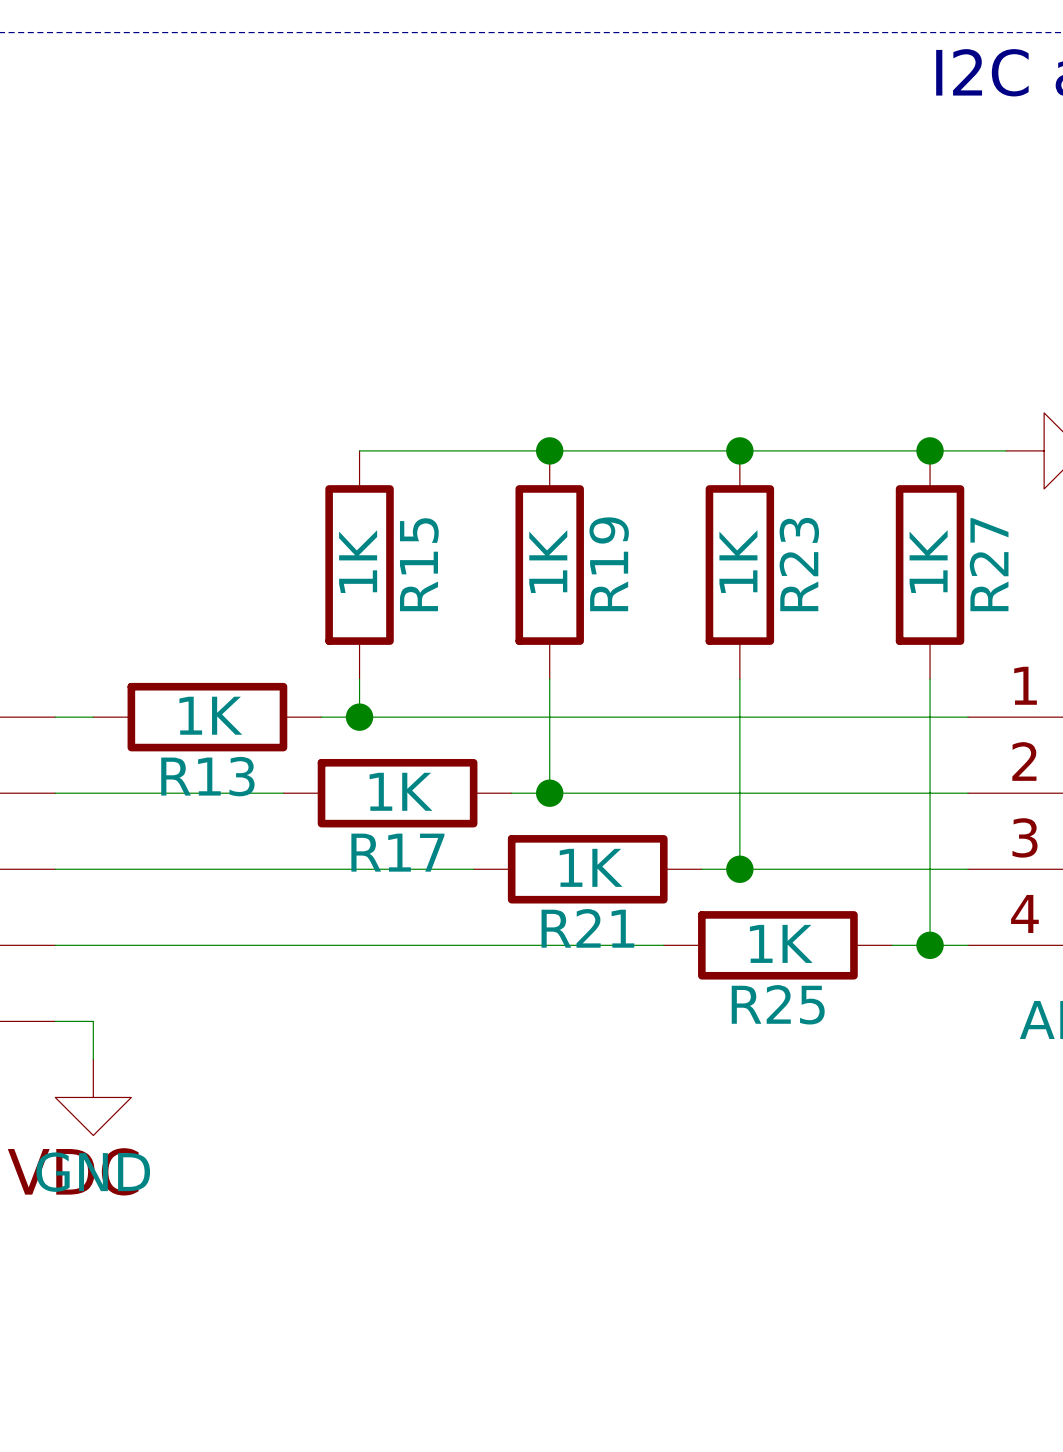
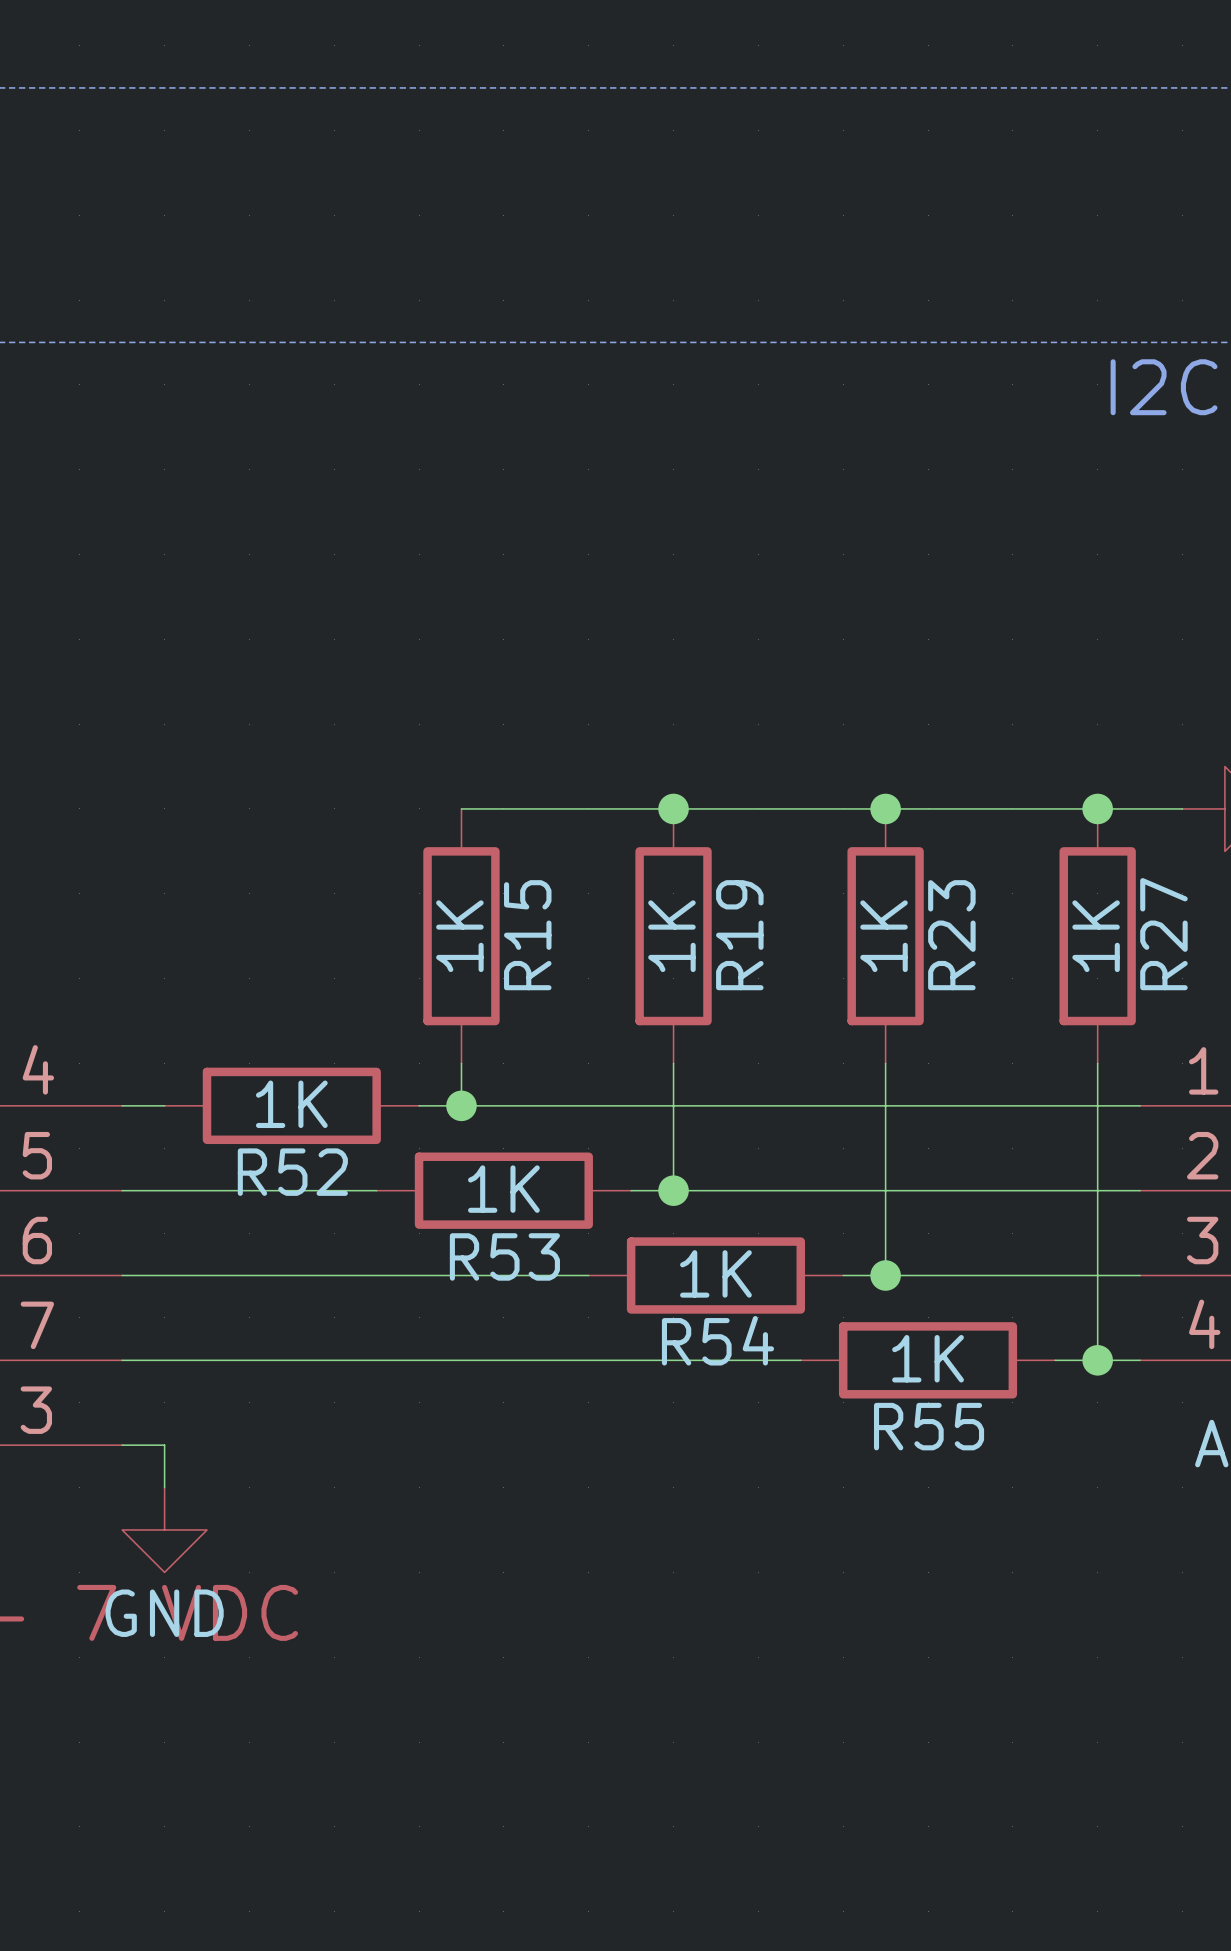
R13 name: R13 (207, 776) -> R52 (292, 1172)
R17 name: R17 (397, 852) -> R53 (504, 1256)
R21 name: R21 (587, 928) -> R54 (717, 1340)
R25 name: R25 (778, 1004) -> R55 (929, 1426)

